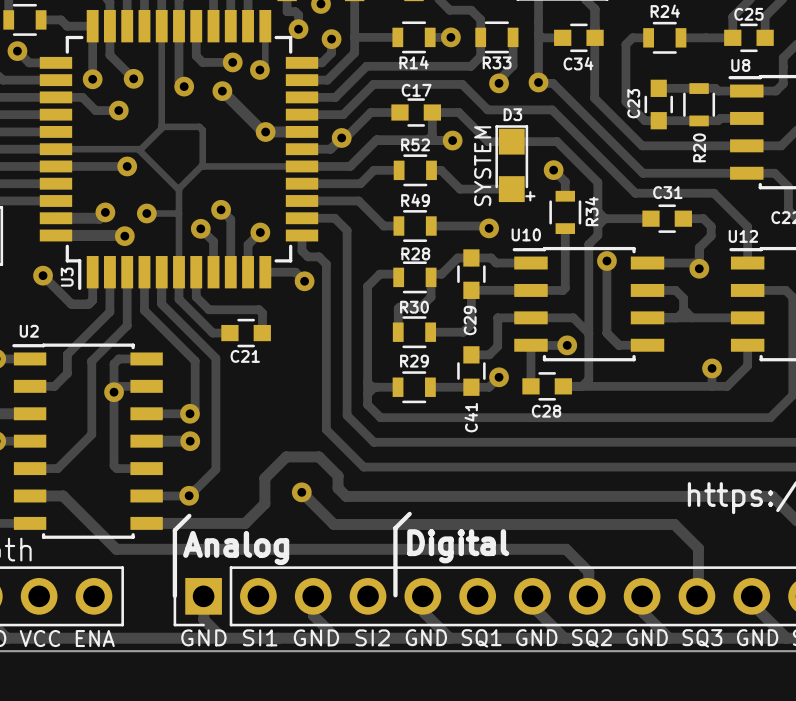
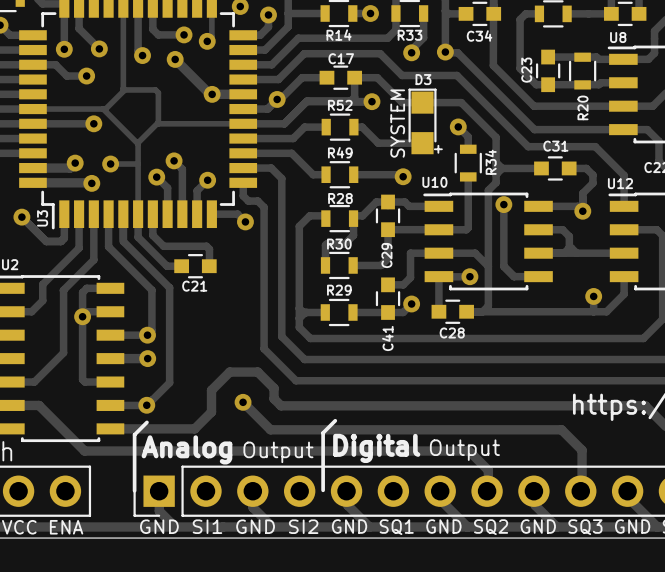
text: none -> Output (464, 450)
text: none -> Output (278, 452)

